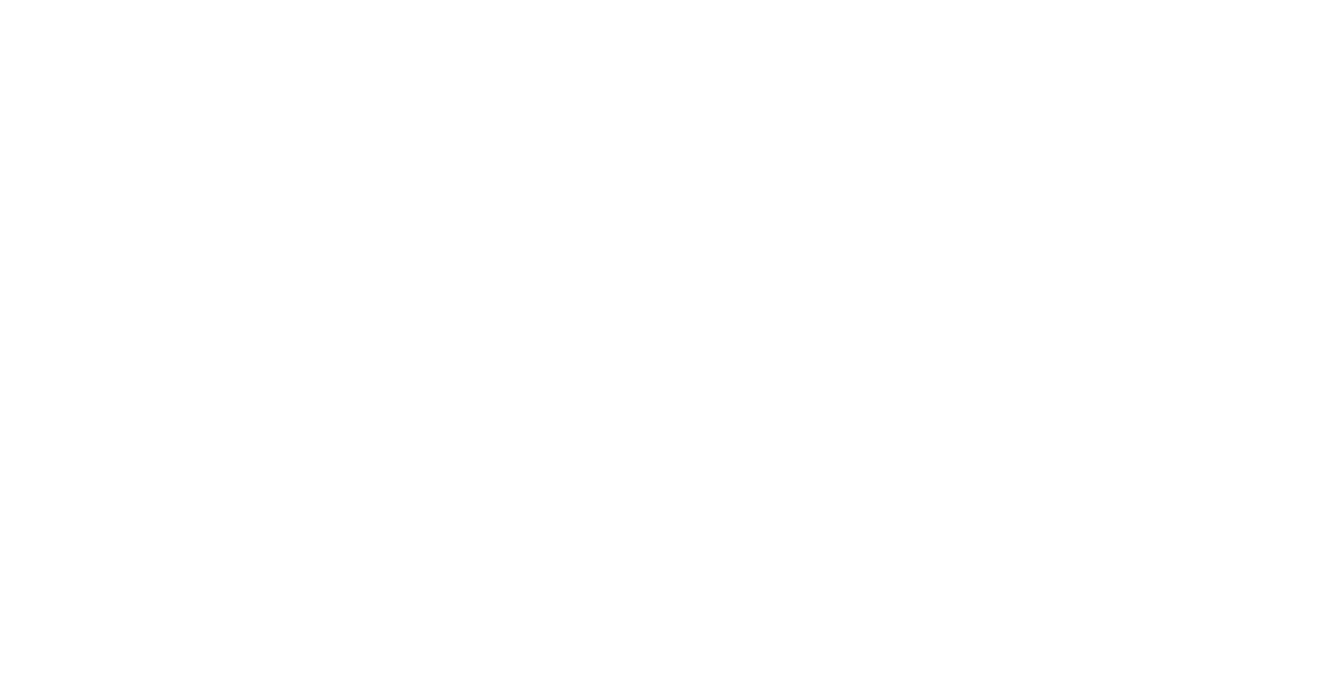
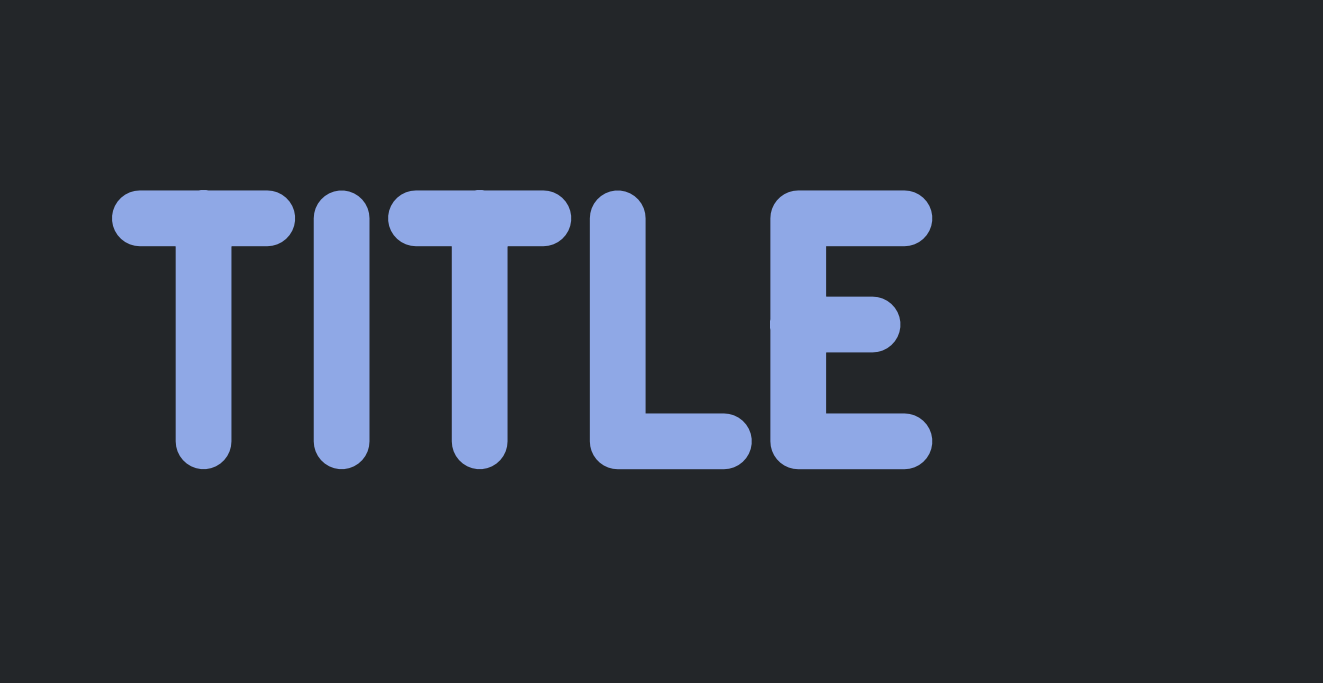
text: none -> TITLE (522, 329)

